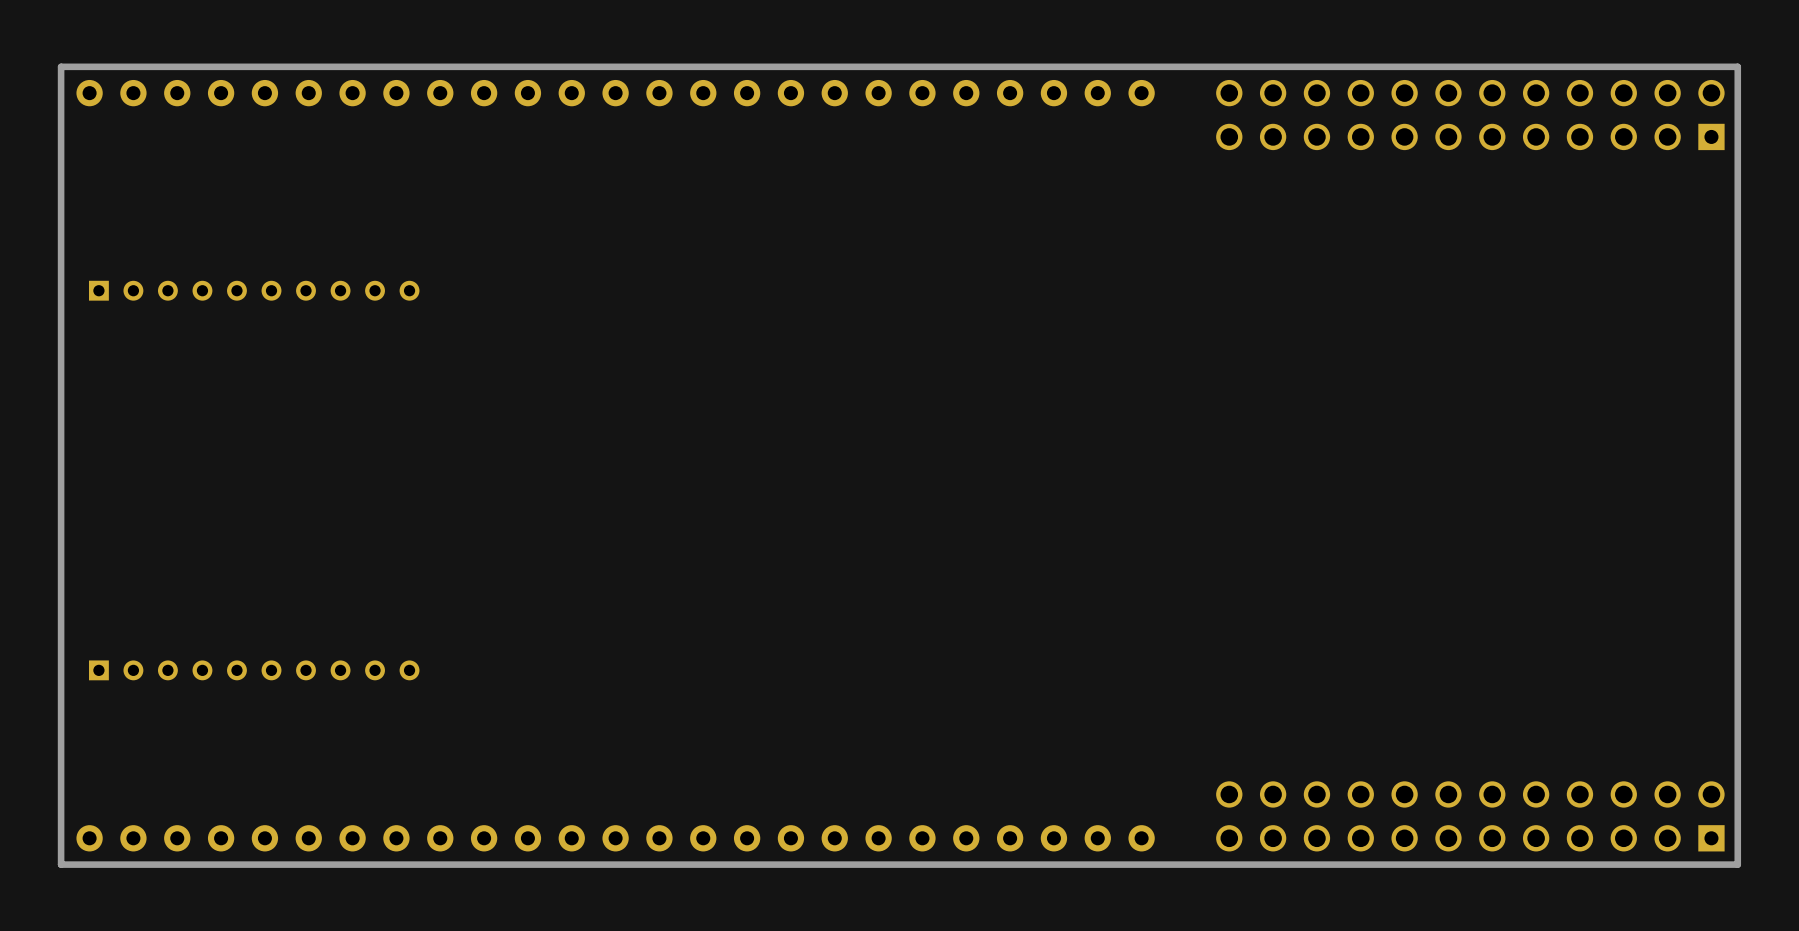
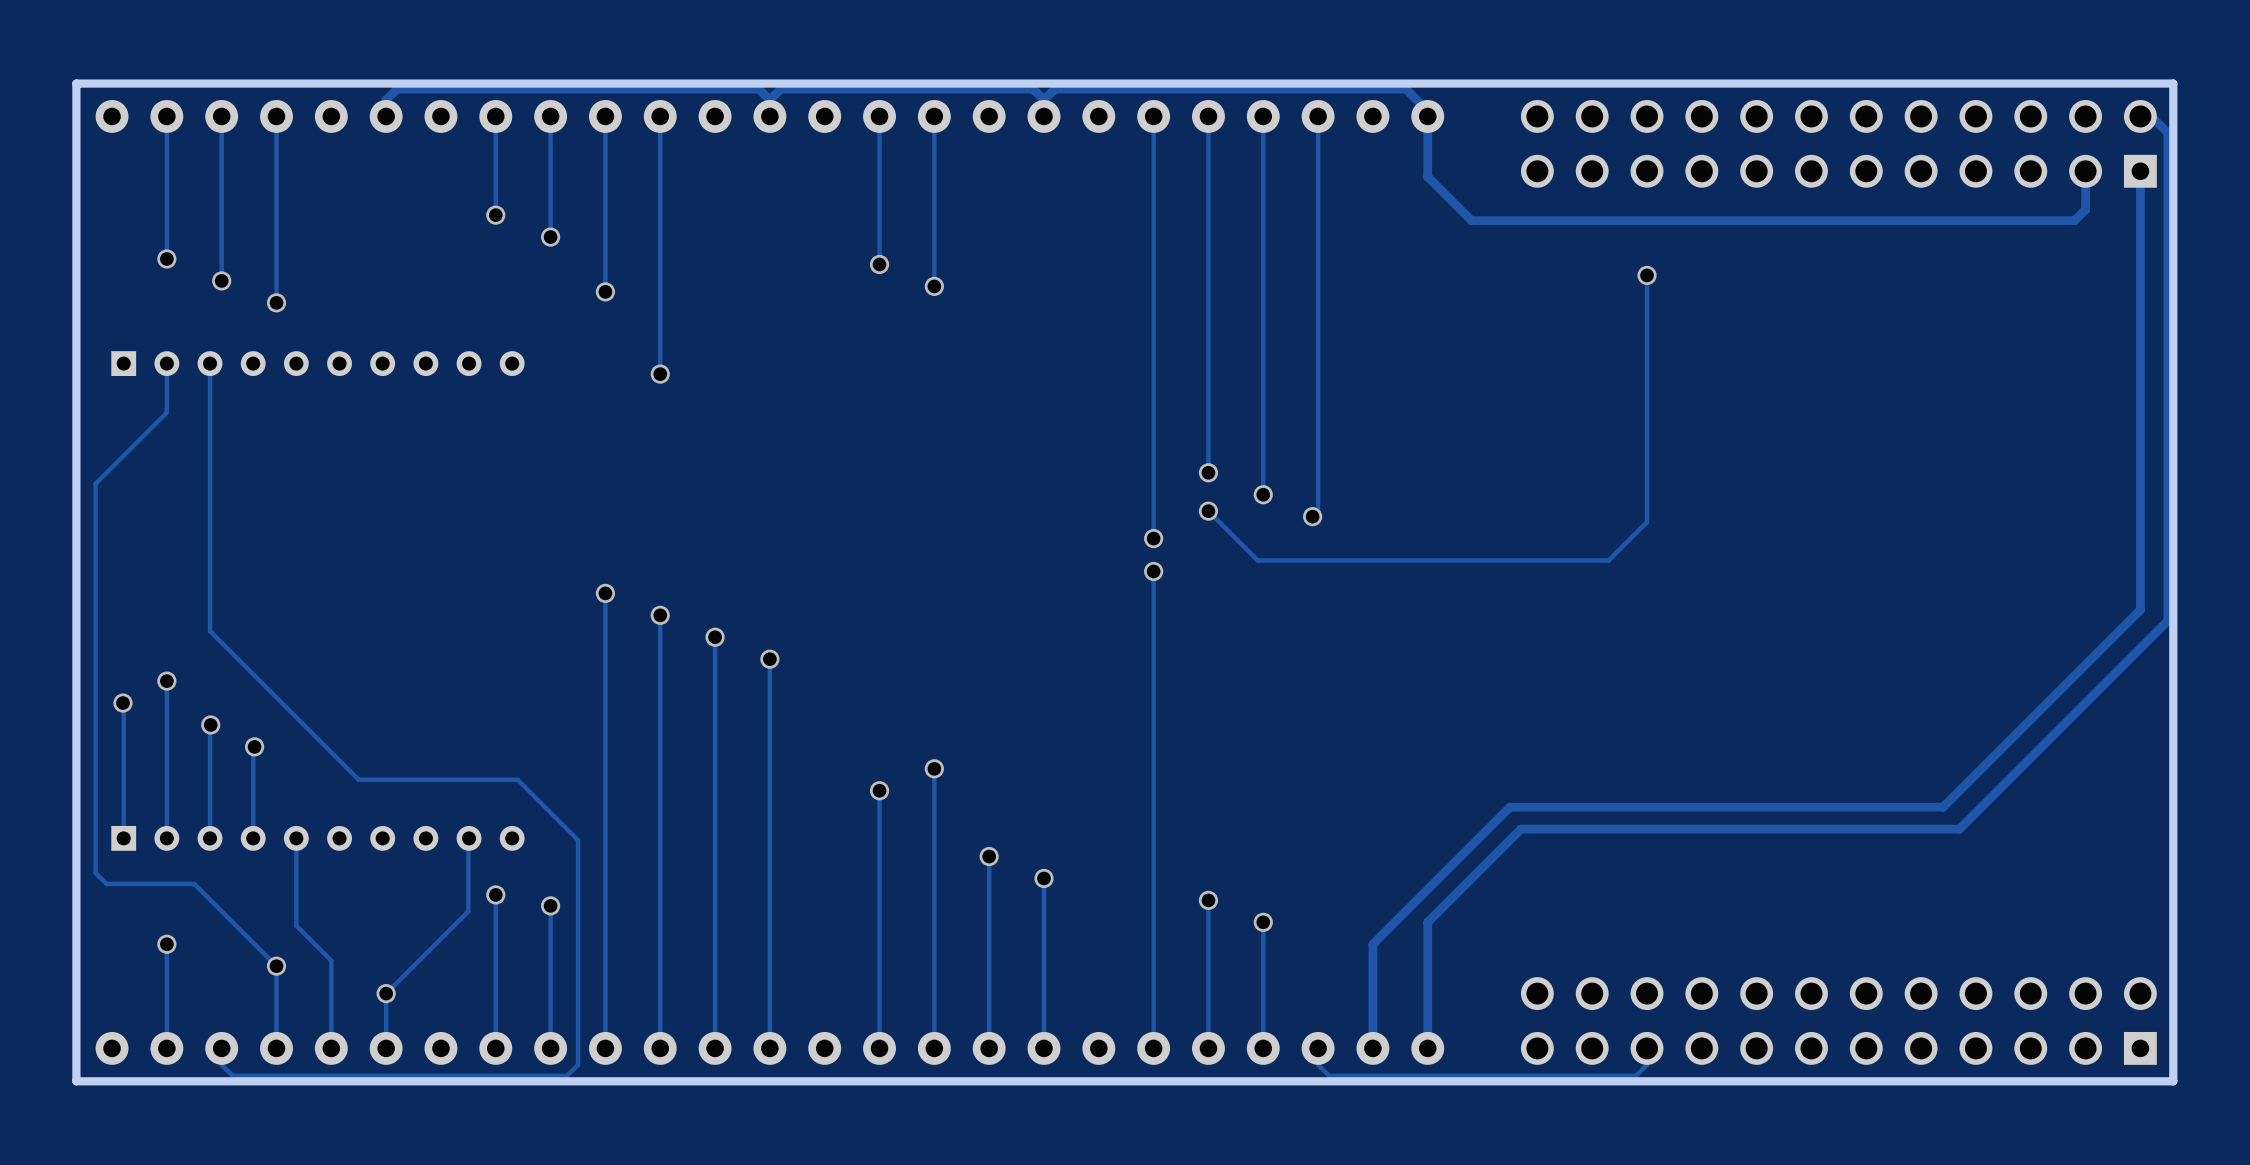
track: none -> (769, 100) (758, 89) (397, 89) (386, 100) (386, 116)
track: none -> (1043, 100) (1033, 89) (780, 89) (769, 100)
track: none -> (1043, 100) (1054, 89) (1405, 89) (1427, 110) (1427, 176) (1471, 220) (2074, 220) (2085, 209) (2085, 171)
track: none -> (166, 116) (166, 258)
track: none -> (221, 116) (221, 280)
track: none -> (276, 116) (276, 302)
track: none -> (495, 116) (495, 215)
track: none -> (550, 116) (550, 237)
track: none -> (605, 116) (605, 291)
track: none -> (660, 116) (660, 374)
track: none -> (879, 116) (879, 264)
track: none -> (934, 116) (934, 286)
track: none -> (1153, 116) (1153, 538)
track: none -> (1208, 116) (1208, 472)
track: none -> (1263, 116) (1263, 494)
track: none -> (1318, 116) (1318, 511) (1312, 516)
track: none -> (2140, 116) (2151, 116) (2167, 132) (2167, 620) (1959, 829) (1520, 829) (1427, 922) (1427, 1048)
track: none -> (2140, 171) (2140, 609) (1943, 807) (1509, 807) (1372, 944) (1372, 1048)
via: none -> (495, 215)
via: none -> (550, 237)
via: none -> (166, 258)
via: none -> (879, 264)
track: none -> (1647, 275) (1647, 522) (1608, 560) (1257, 560) (1208, 511)
via: none -> (1647, 275)
via: none -> (221, 280)
via: none -> (934, 286)
via: none -> (605, 291)
via: none -> (276, 302)
track: none -> (166, 363) (166, 412) (95, 483) (95, 872) (106, 883) (194, 883) (276, 966) (276, 1048)
track: none -> (210, 363) (210, 631) (358, 779) (517, 779) (578, 840) (578, 1064) (567, 1075) (232, 1075) (221, 1064) (221, 1048)
via: none -> (660, 374)
via: none -> (1208, 472)
via: none -> (1263, 494)
via: none -> (1208, 511)
via: none -> (1312, 516)
via: none -> (1153, 538)
track: none -> (1153, 571) (1153, 1048)
via: none -> (1153, 571)
track: none -> (605, 593) (605, 1048)
via: none -> (605, 593)
track: none -> (660, 615) (660, 1048)
via: none -> (660, 615)
track: none -> (715, 637) (715, 1048)
via: none -> (715, 637)
track: none -> (769, 659) (769, 1048)
via: none -> (769, 659)
track: none -> (166, 681) (166, 838)
via: none -> (166, 681)
track: none -> (123, 703) (123, 838)
via: none -> (123, 703)
track: none -> (210, 724) (210, 838)
via: none -> (210, 724)
track: none -> (254, 746) (253, 838)
via: none -> (254, 746)
track: none -> (934, 768) (934, 1048)
via: none -> (934, 768)
track: none -> (879, 790) (879, 1048)
via: none -> (879, 790)
track: none -> (296, 838) (296, 925) (331, 960) (331, 1048)
track: none -> (469, 838) (468, 911) (386, 993) (386, 1048)
track: none -> (989, 856) (989, 1048)
via: none -> (989, 856)
track: none -> (1043, 878) (1043, 1048)
via: none -> (1043, 878)
track: none -> (495, 894) (495, 1048)
via: none -> (495, 894)
track: none -> (1208, 900) (1208, 1048)
via: none -> (1208, 900)
track: none -> (550, 905) (550, 1048)
via: none -> (550, 905)
track: none -> (1263, 922) (1263, 1048)
via: none -> (1263, 922)
track: none -> (166, 944) (166, 1048)
via: none -> (166, 944)
via: none -> (276, 966)
via: none -> (386, 993)
track: none -> (1647, 1048) (1647, 1064) (1636, 1075) (1329, 1075) (1318, 1064) (1318, 1048)

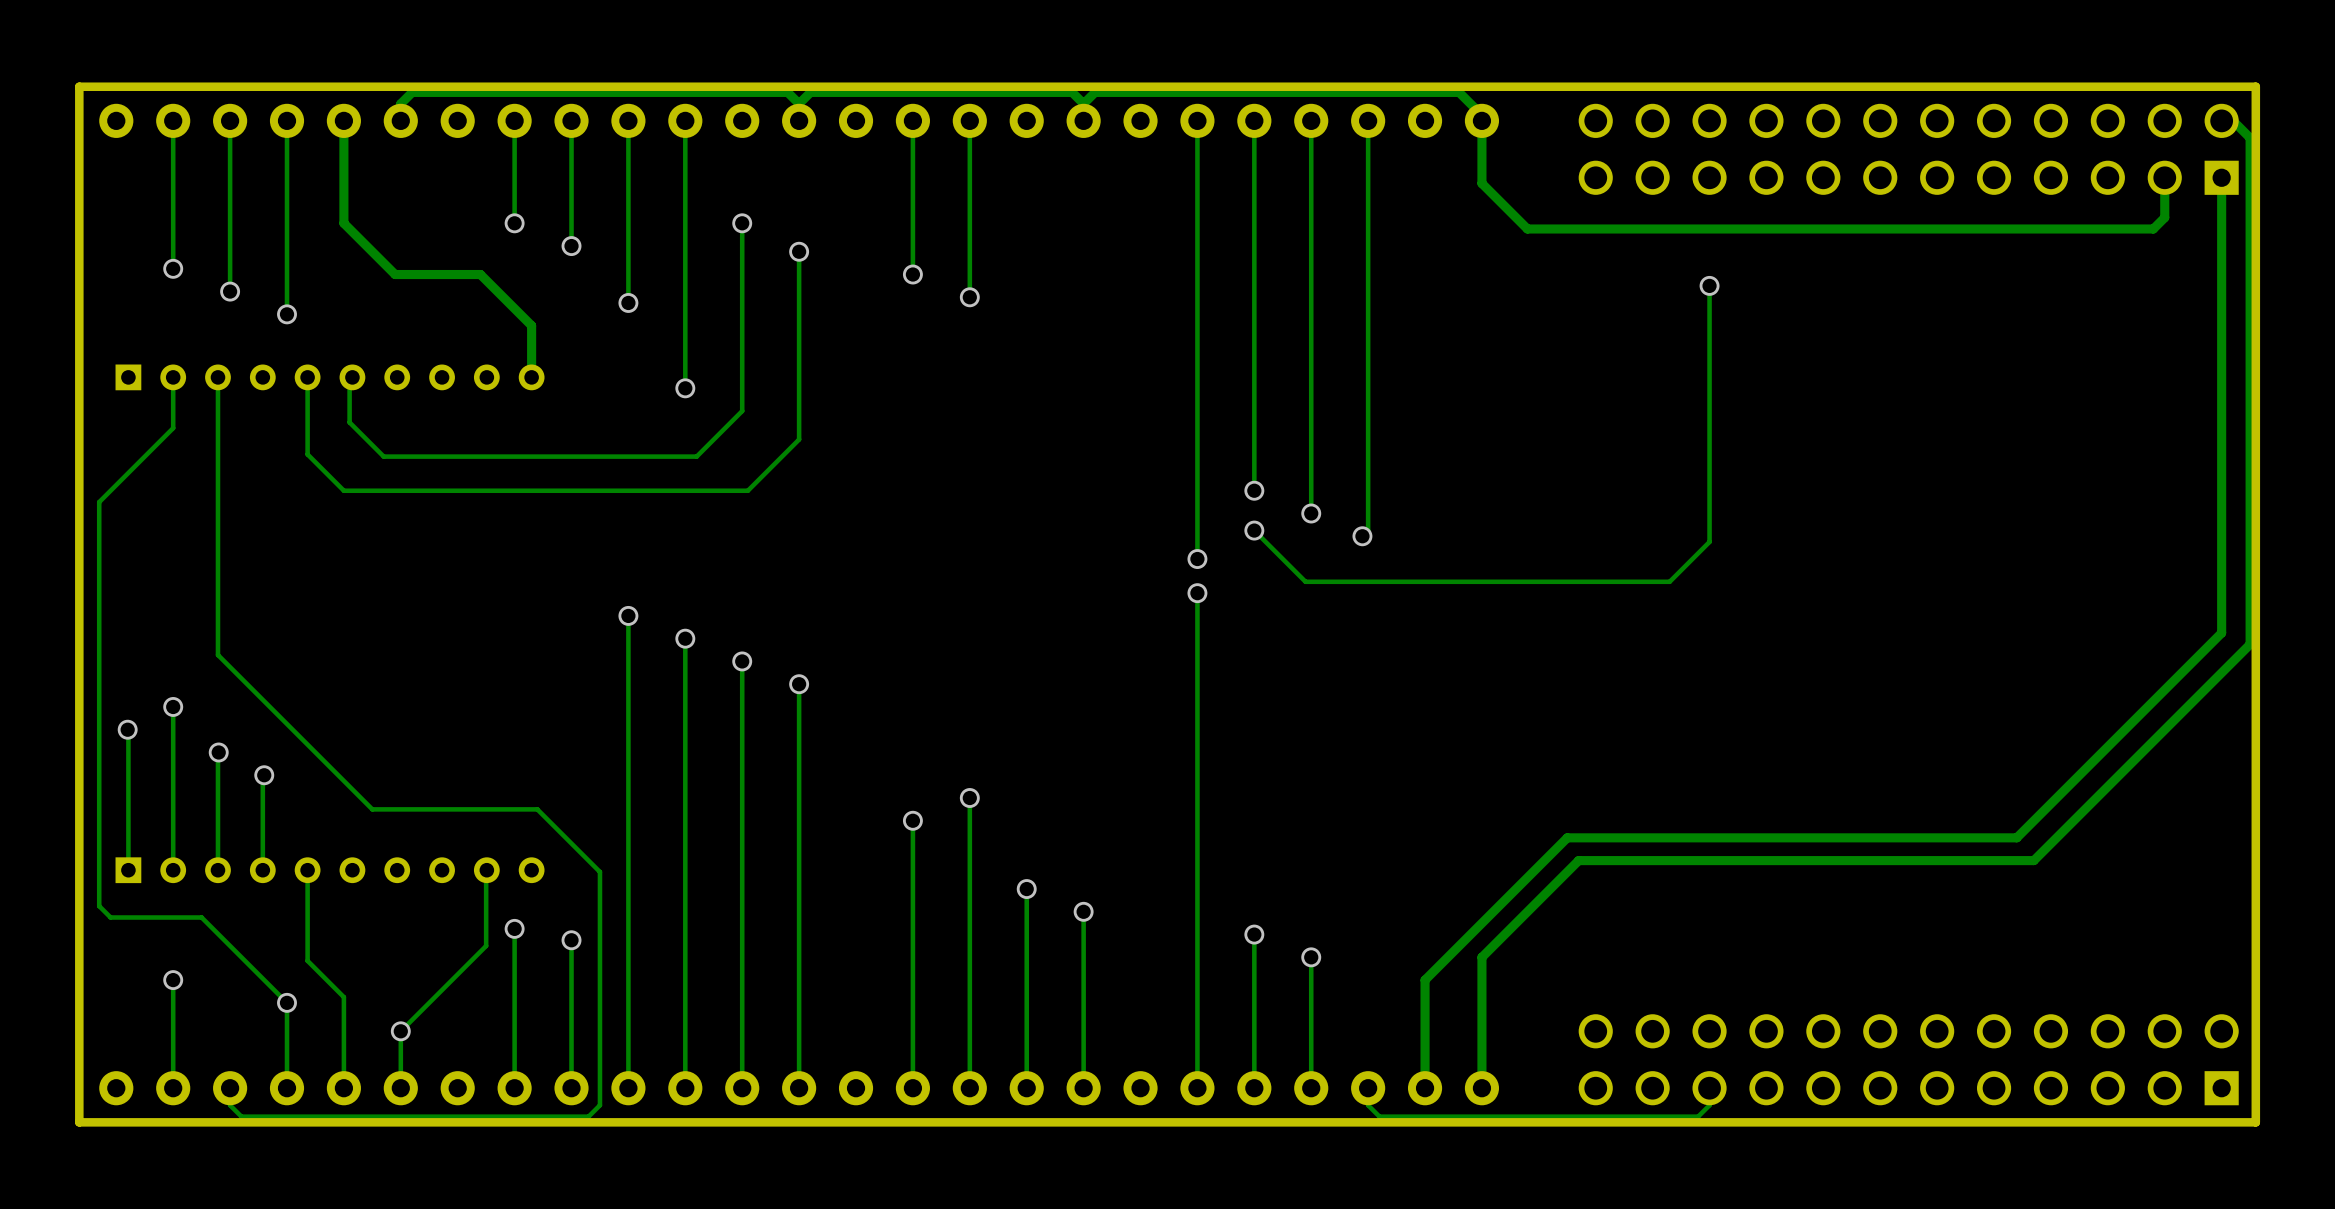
track: none -> (343, 120) (343, 223) (395, 274) (480, 274) (531, 325) (531, 377)
track: none -> (742, 223) (742, 411) (696, 456) (383, 456) (349, 422) (349, 380) (352, 377)
via: none -> (742, 223)
track: none -> (799, 251) (799, 439) (747, 490) (343, 490) (307, 454) (307, 377)
via: none -> (799, 251)

